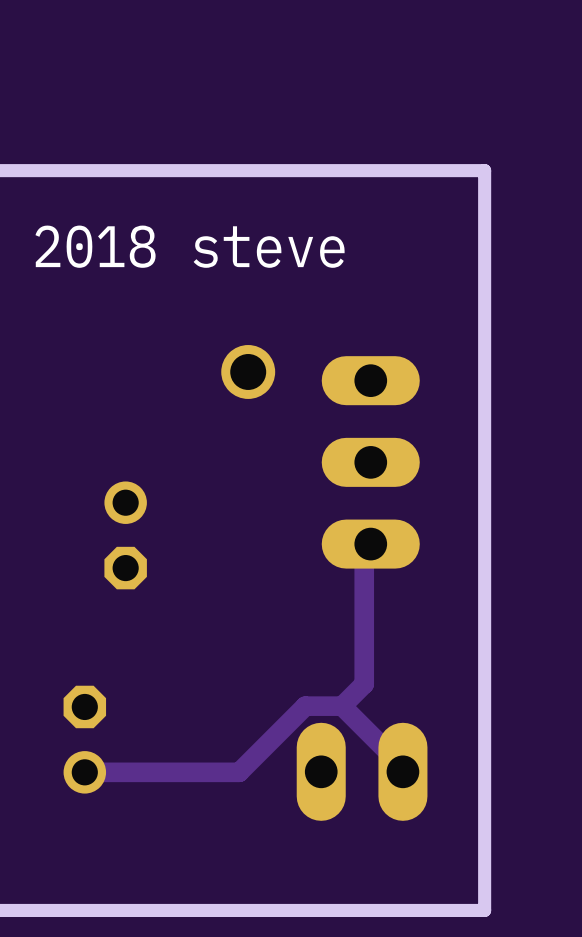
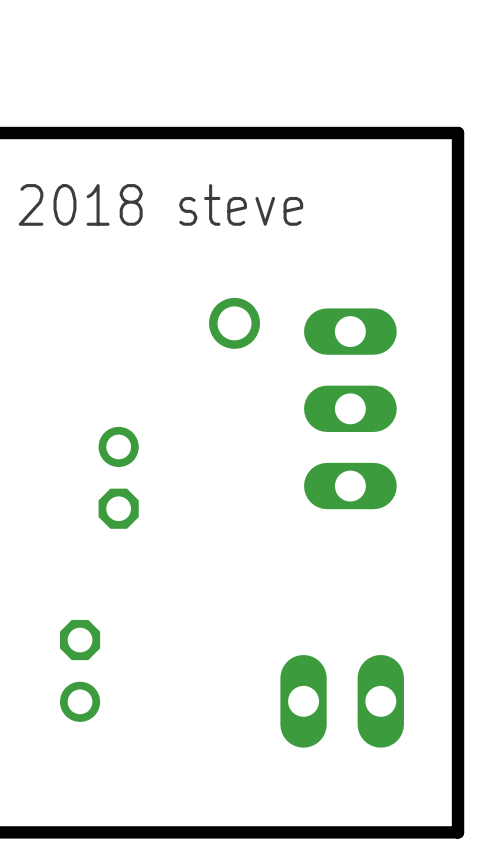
track: (370, 544) (364, 544) (364, 684) (342, 706) -> none
track: (342, 706) (305, 706) (239, 772) (84, 772) -> none
track: (342, 706) (401, 764) (402, 771) -> none

